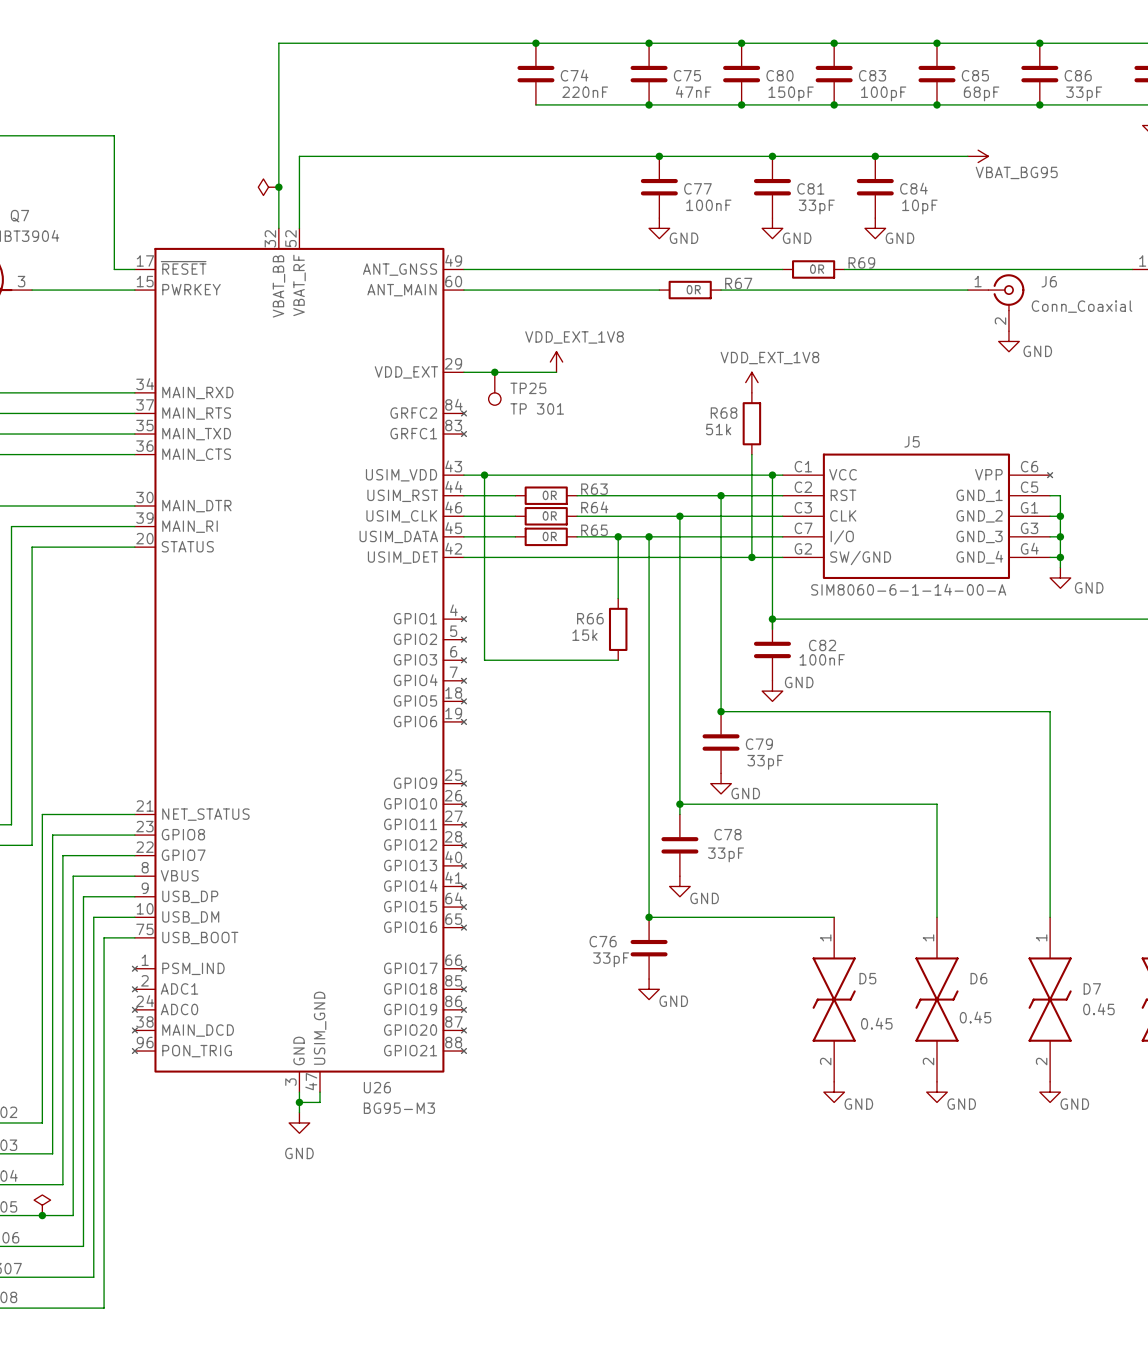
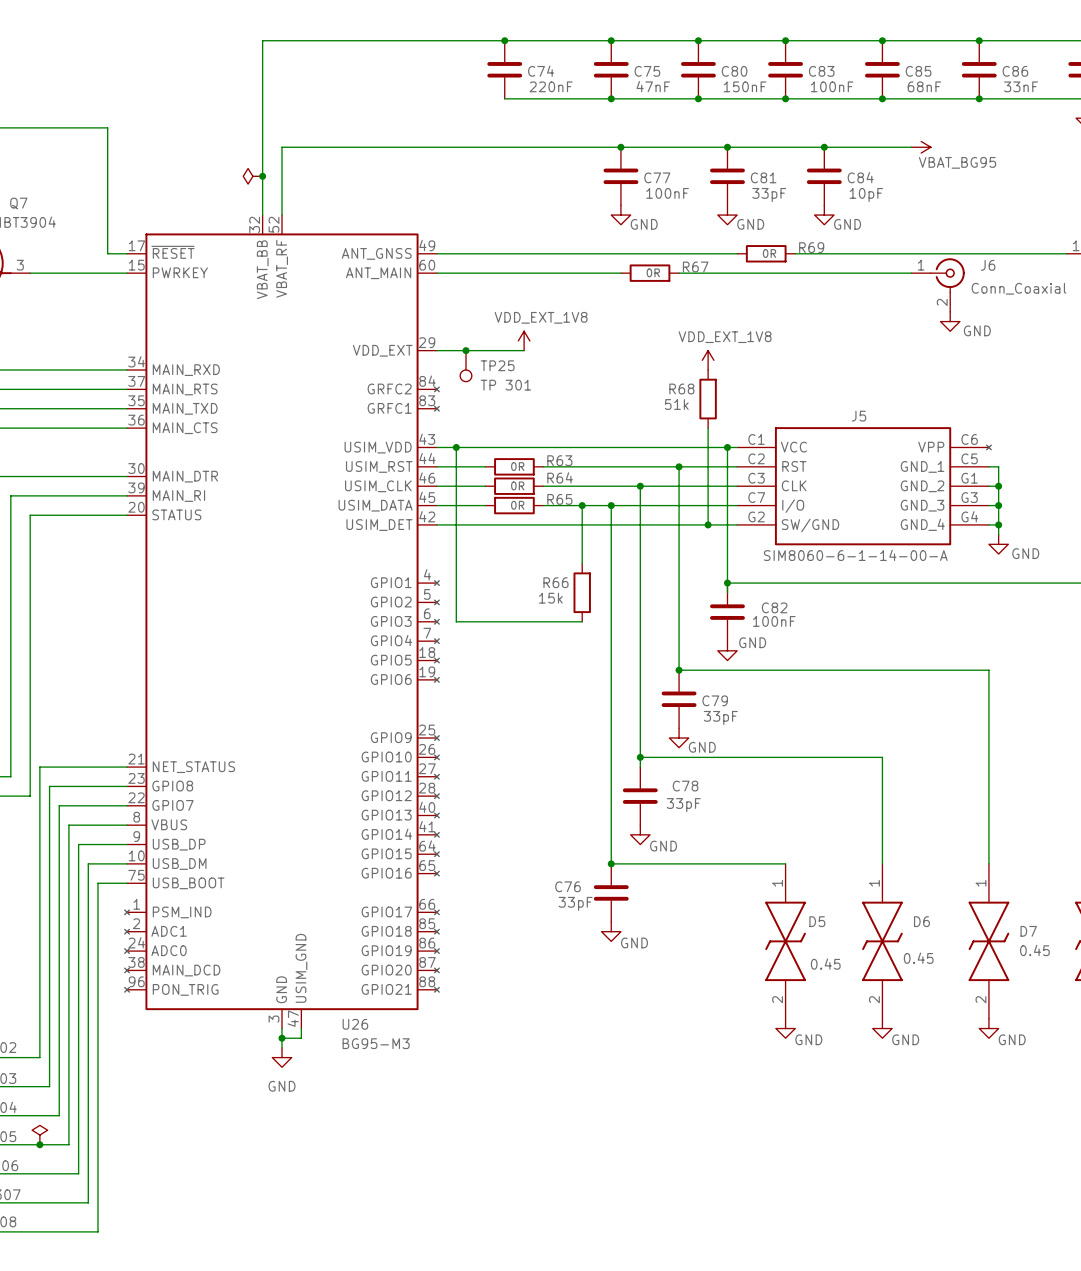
C80 value: 150pF (791, 93) -> 150nF (745, 86)
C83 value: 100pF (883, 93) -> 100nF (832, 86)
C85 value: 68pF (981, 93) -> 68nF (924, 86)
C86 value: 33pF (1084, 93) -> 33nF (1021, 86)

